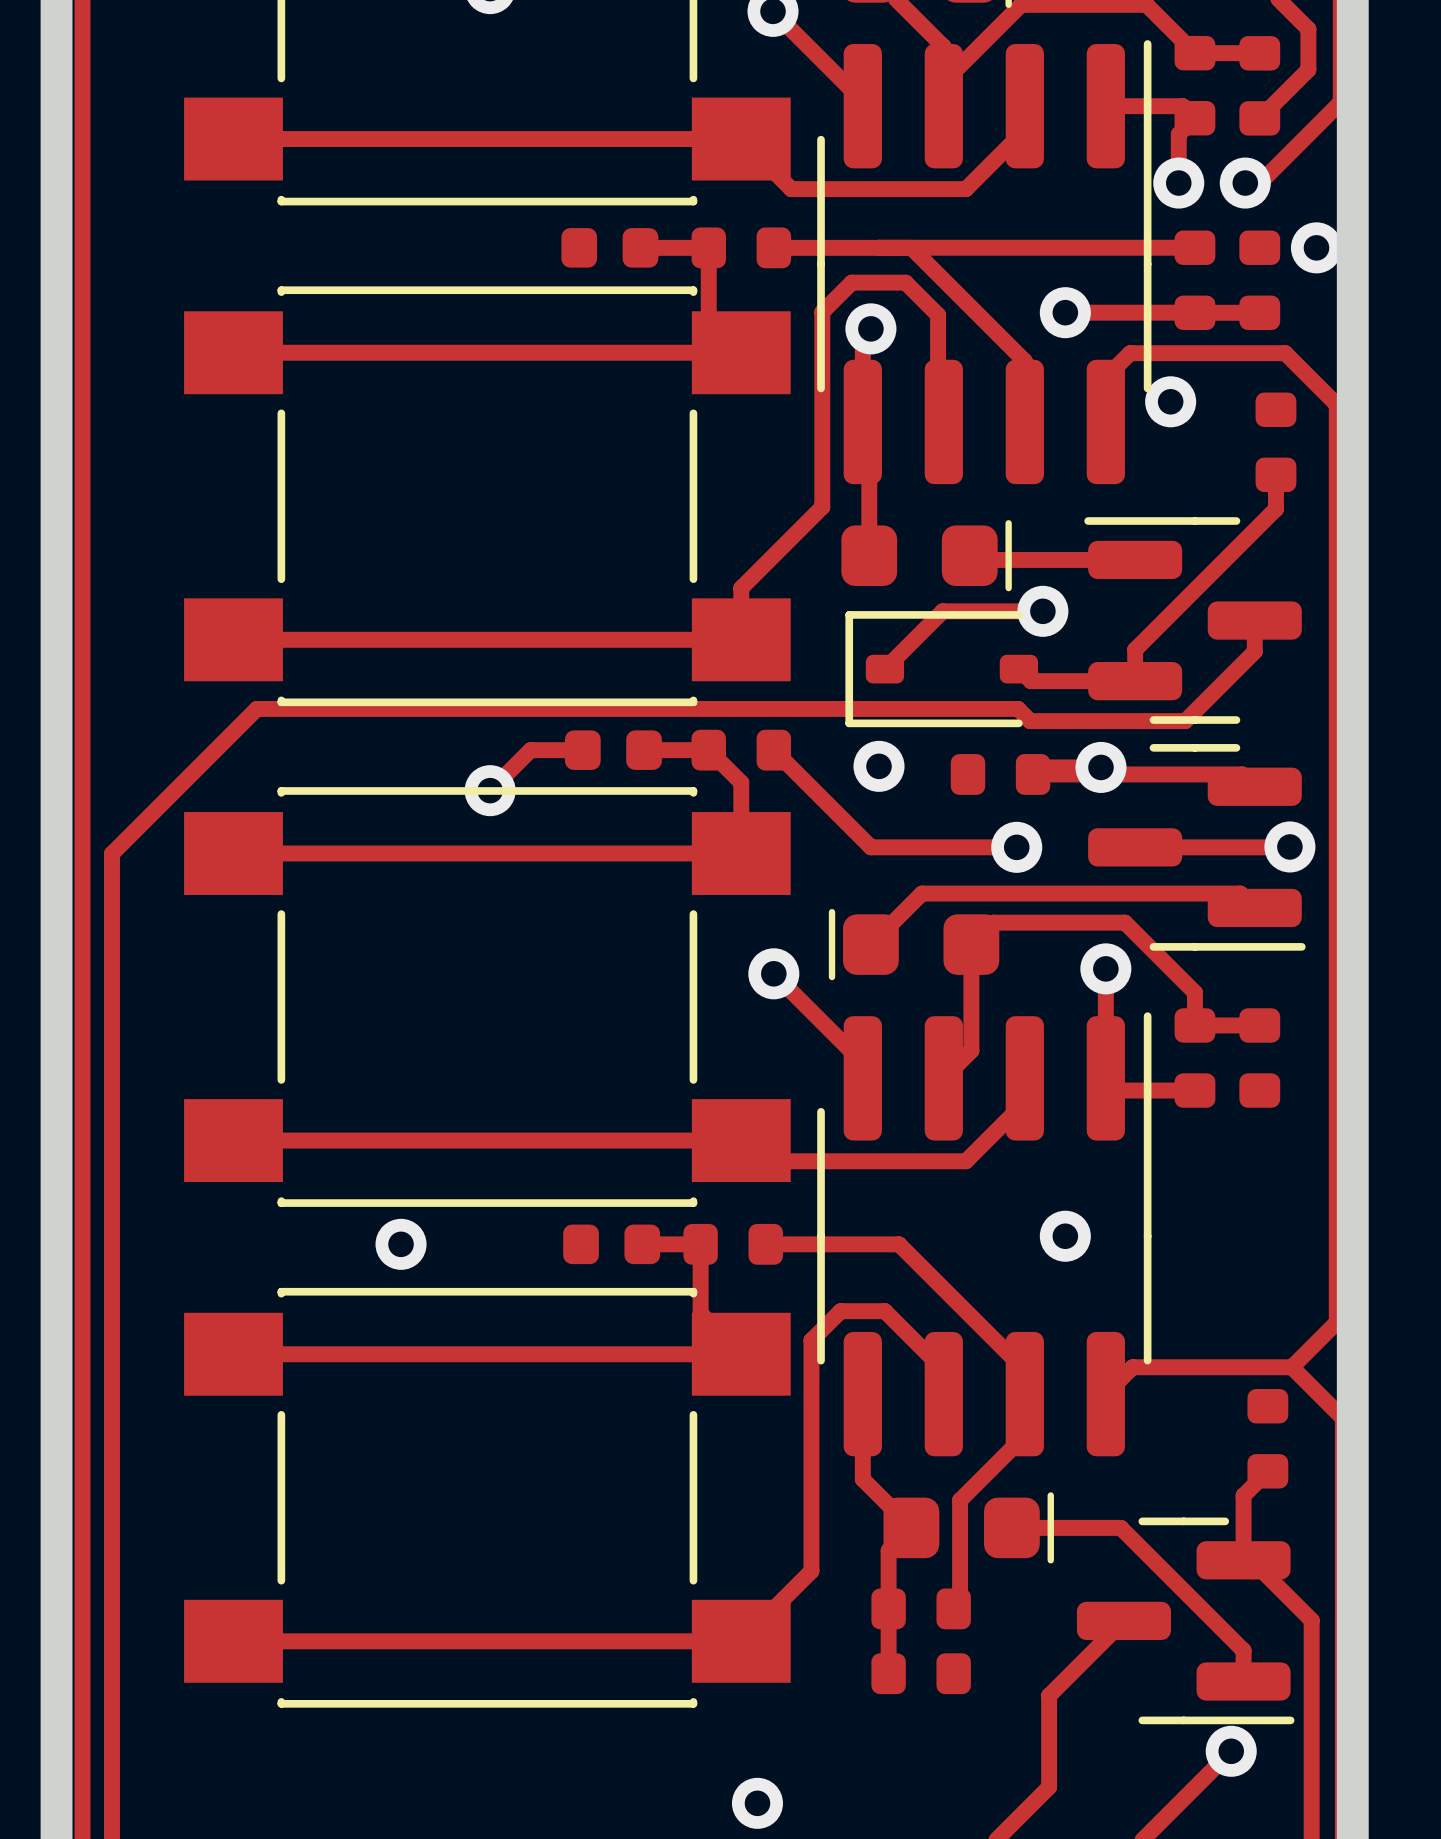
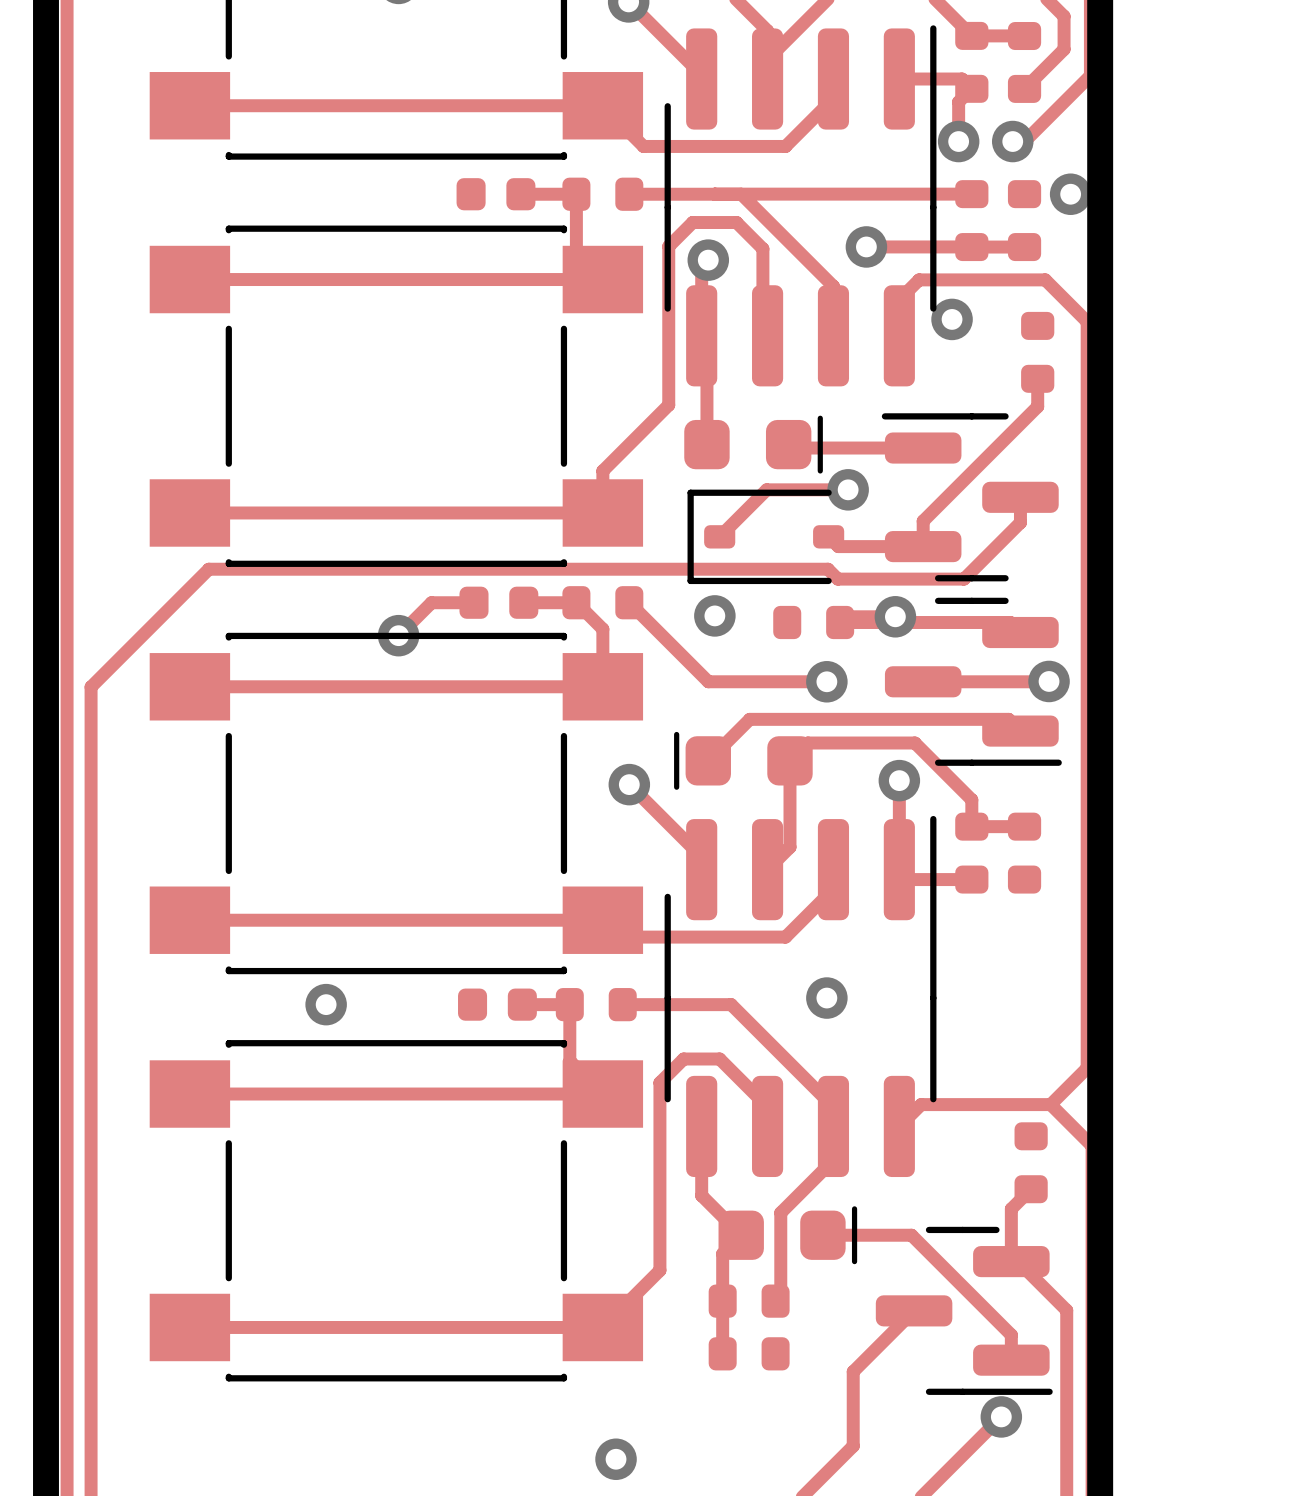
via position: (1065, 1236) -> (826, 998)

